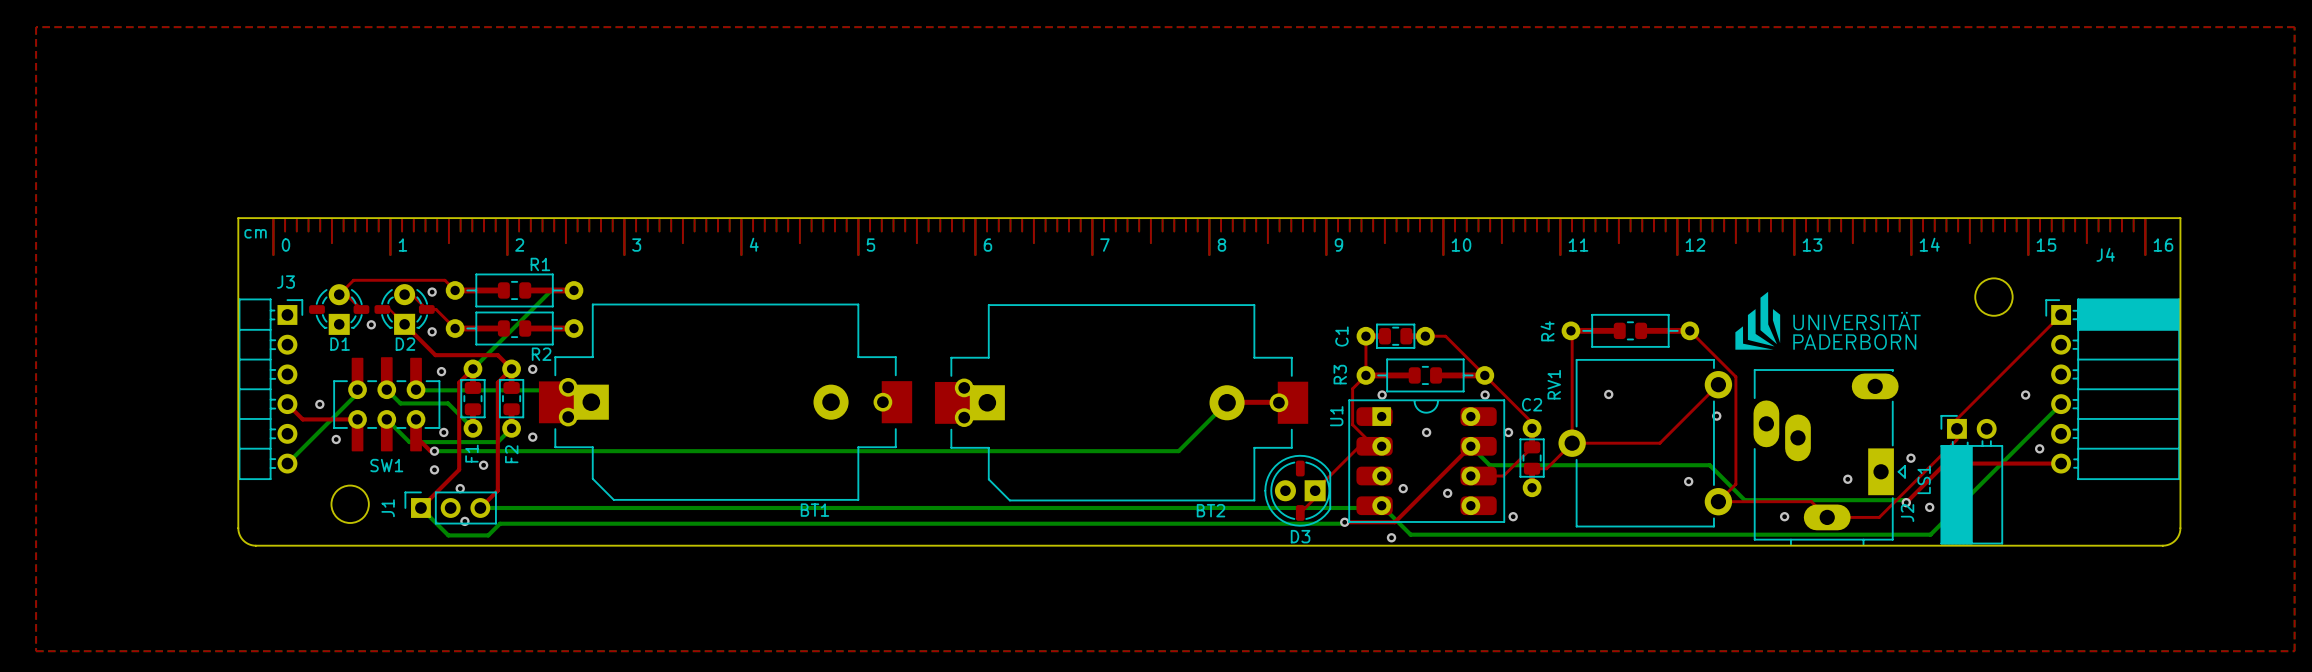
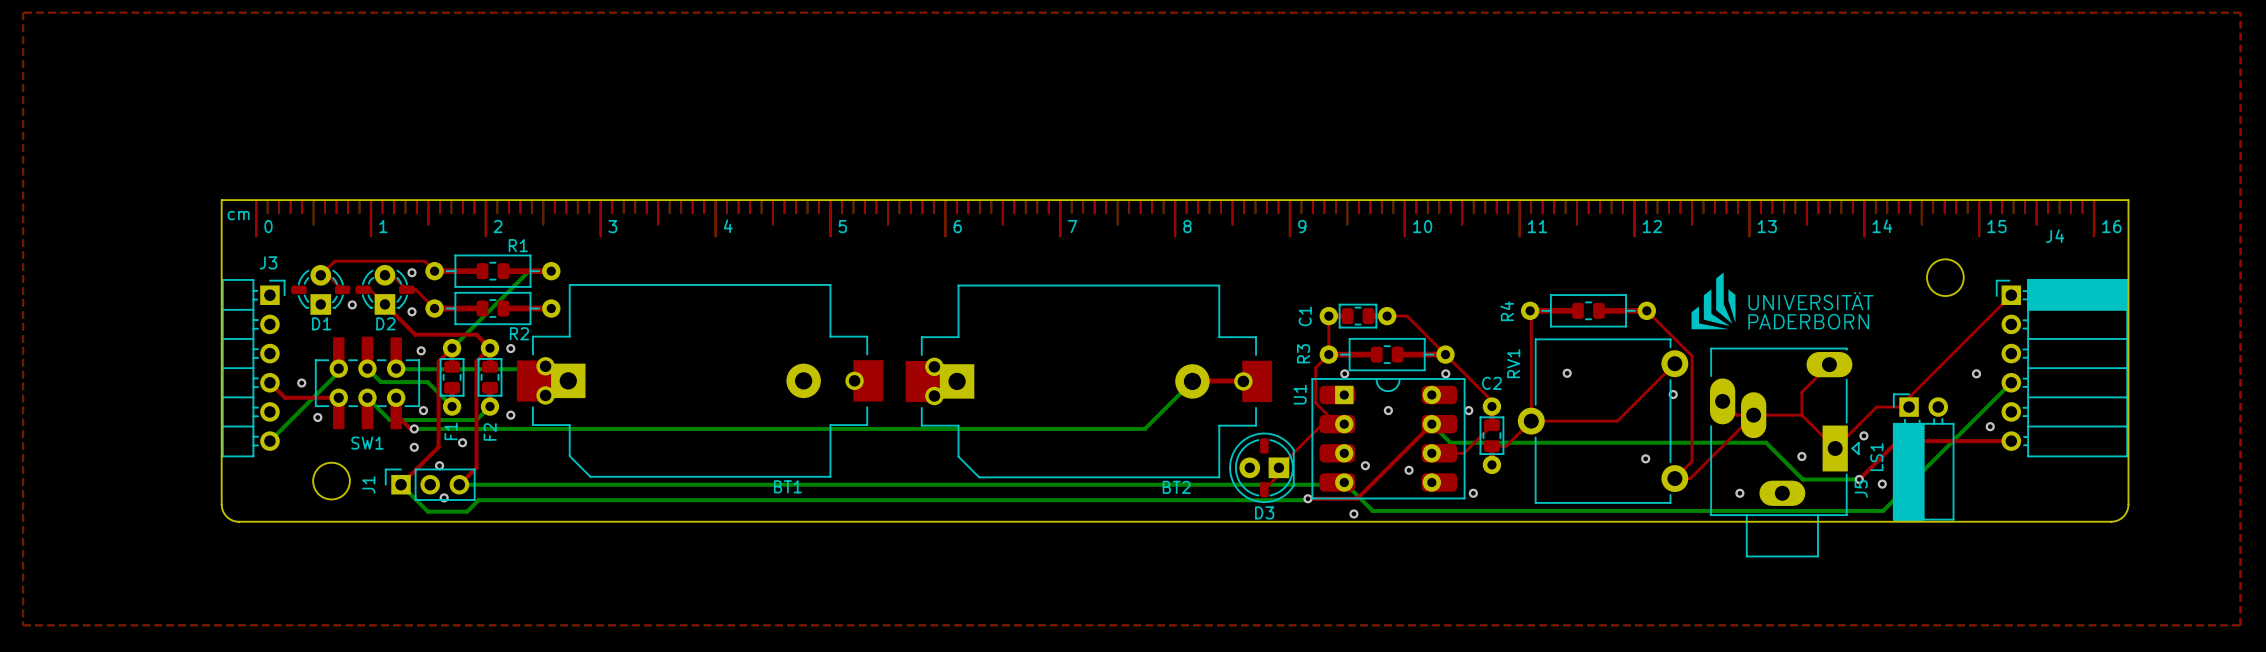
top track: none -> (1829, 364) (1801, 392) (1801, 415)
top track: none -> (1722, 401) (1736, 415) (1801, 415)
top track: (1956, 428) (1956, 439) (1879, 517) (1827, 517) (1811, 501) (1734, 501) -> (1909, 407) (1876, 407) (1835, 448) (1801, 415)
top track: none -> (1753, 415) (1690, 478)
J2: (1829, 457) -> none
bottom track: (1709, 465) (1744, 500) (1903, 500) (1906, 502) -> (1666, 442) (1766, 442) (1802, 479) (1859, 479)
J5: none -> (1784, 452)

